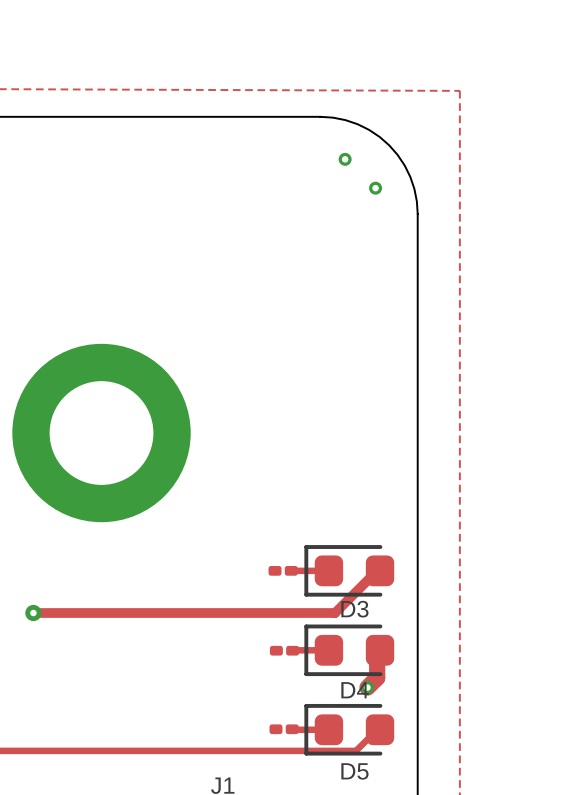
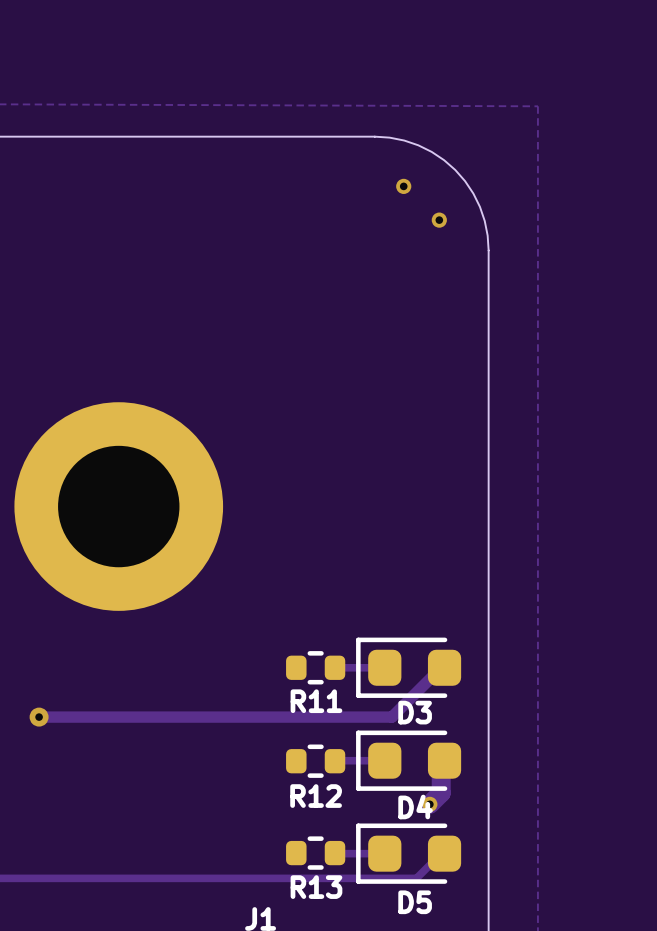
R11: none -> (315, 667)
part: (283, 570) -> none
R12: none -> (315, 761)
part: (284, 650) -> none
R13: none -> (315, 853)
part: (284, 729) -> none

